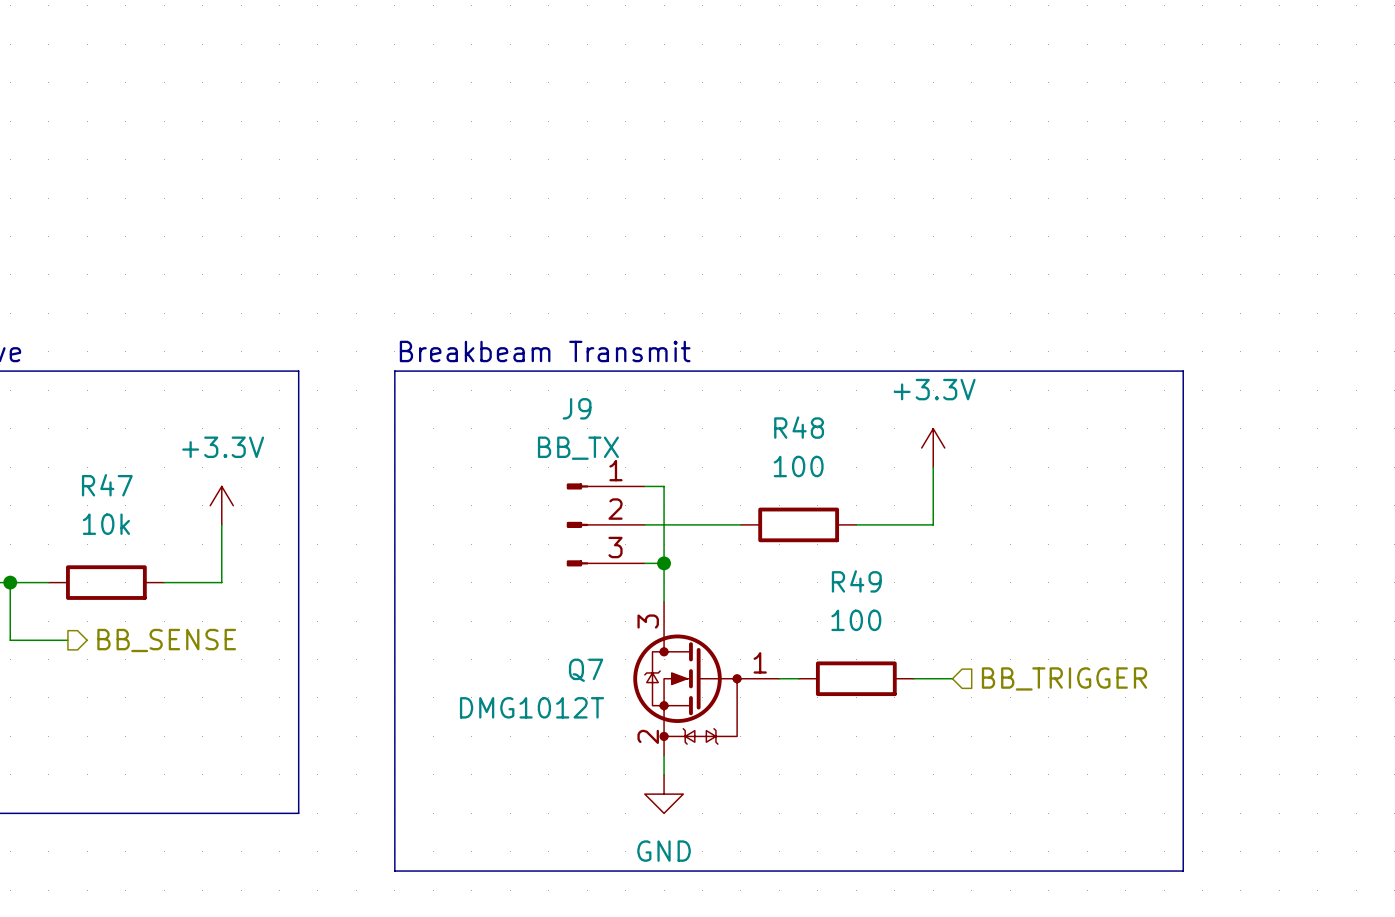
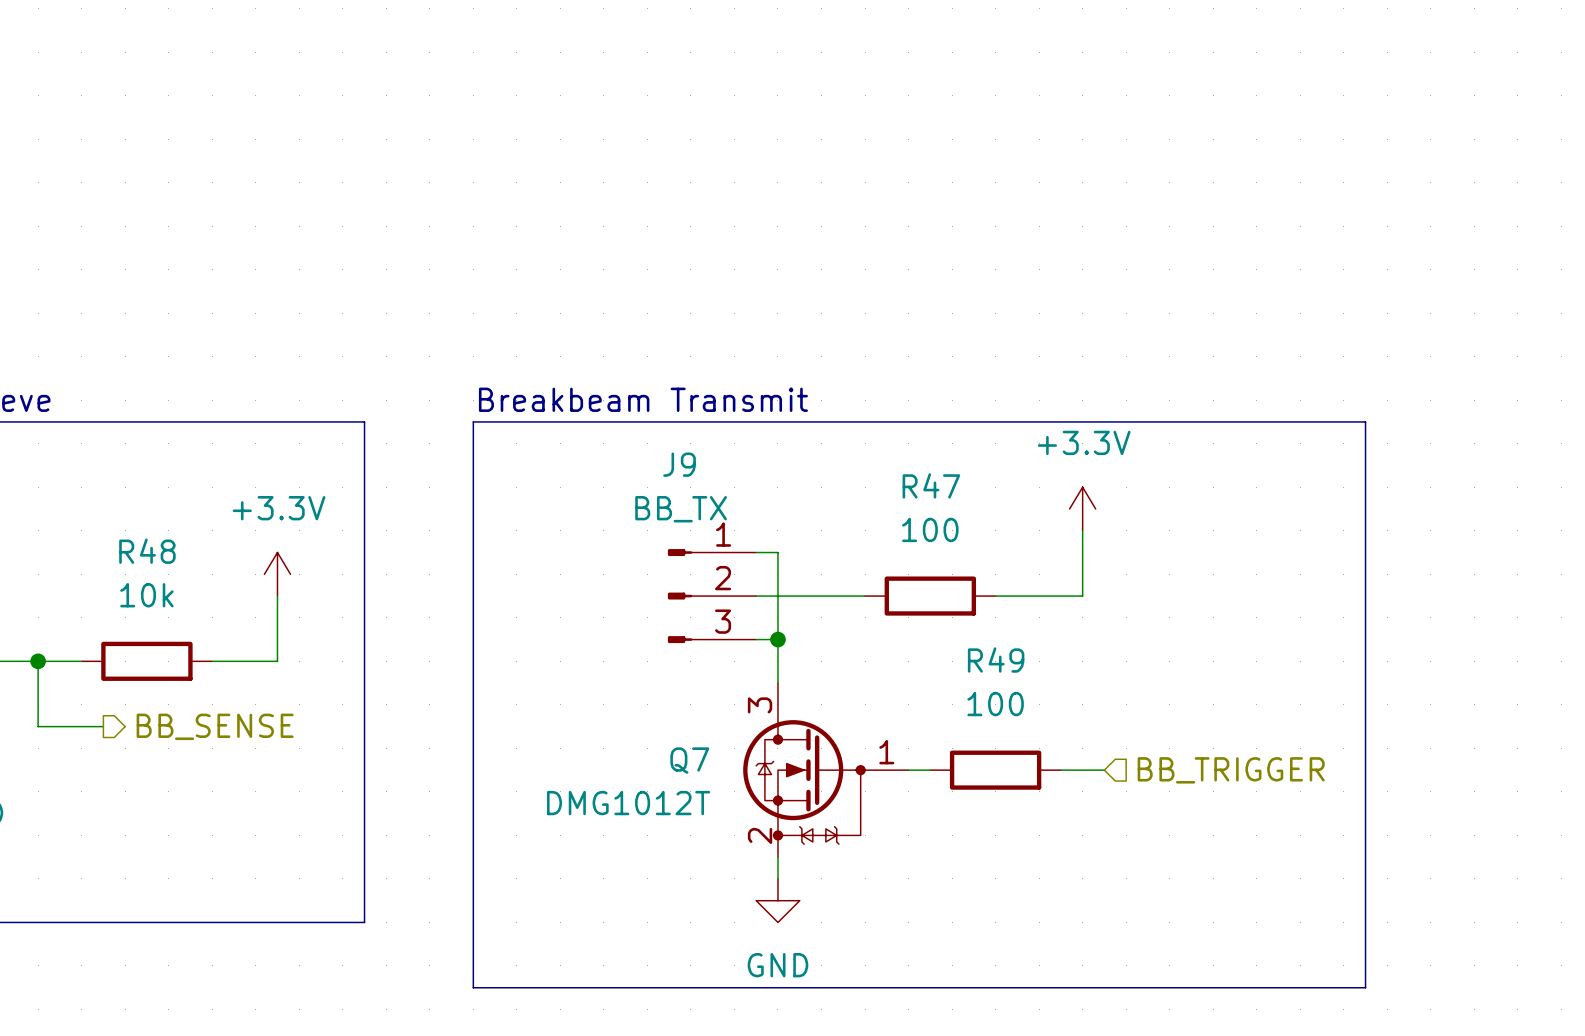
R48 name: R48 (799, 427) -> R47 (931, 485)
R47 name: R47 (107, 485) -> R48 (147, 551)

